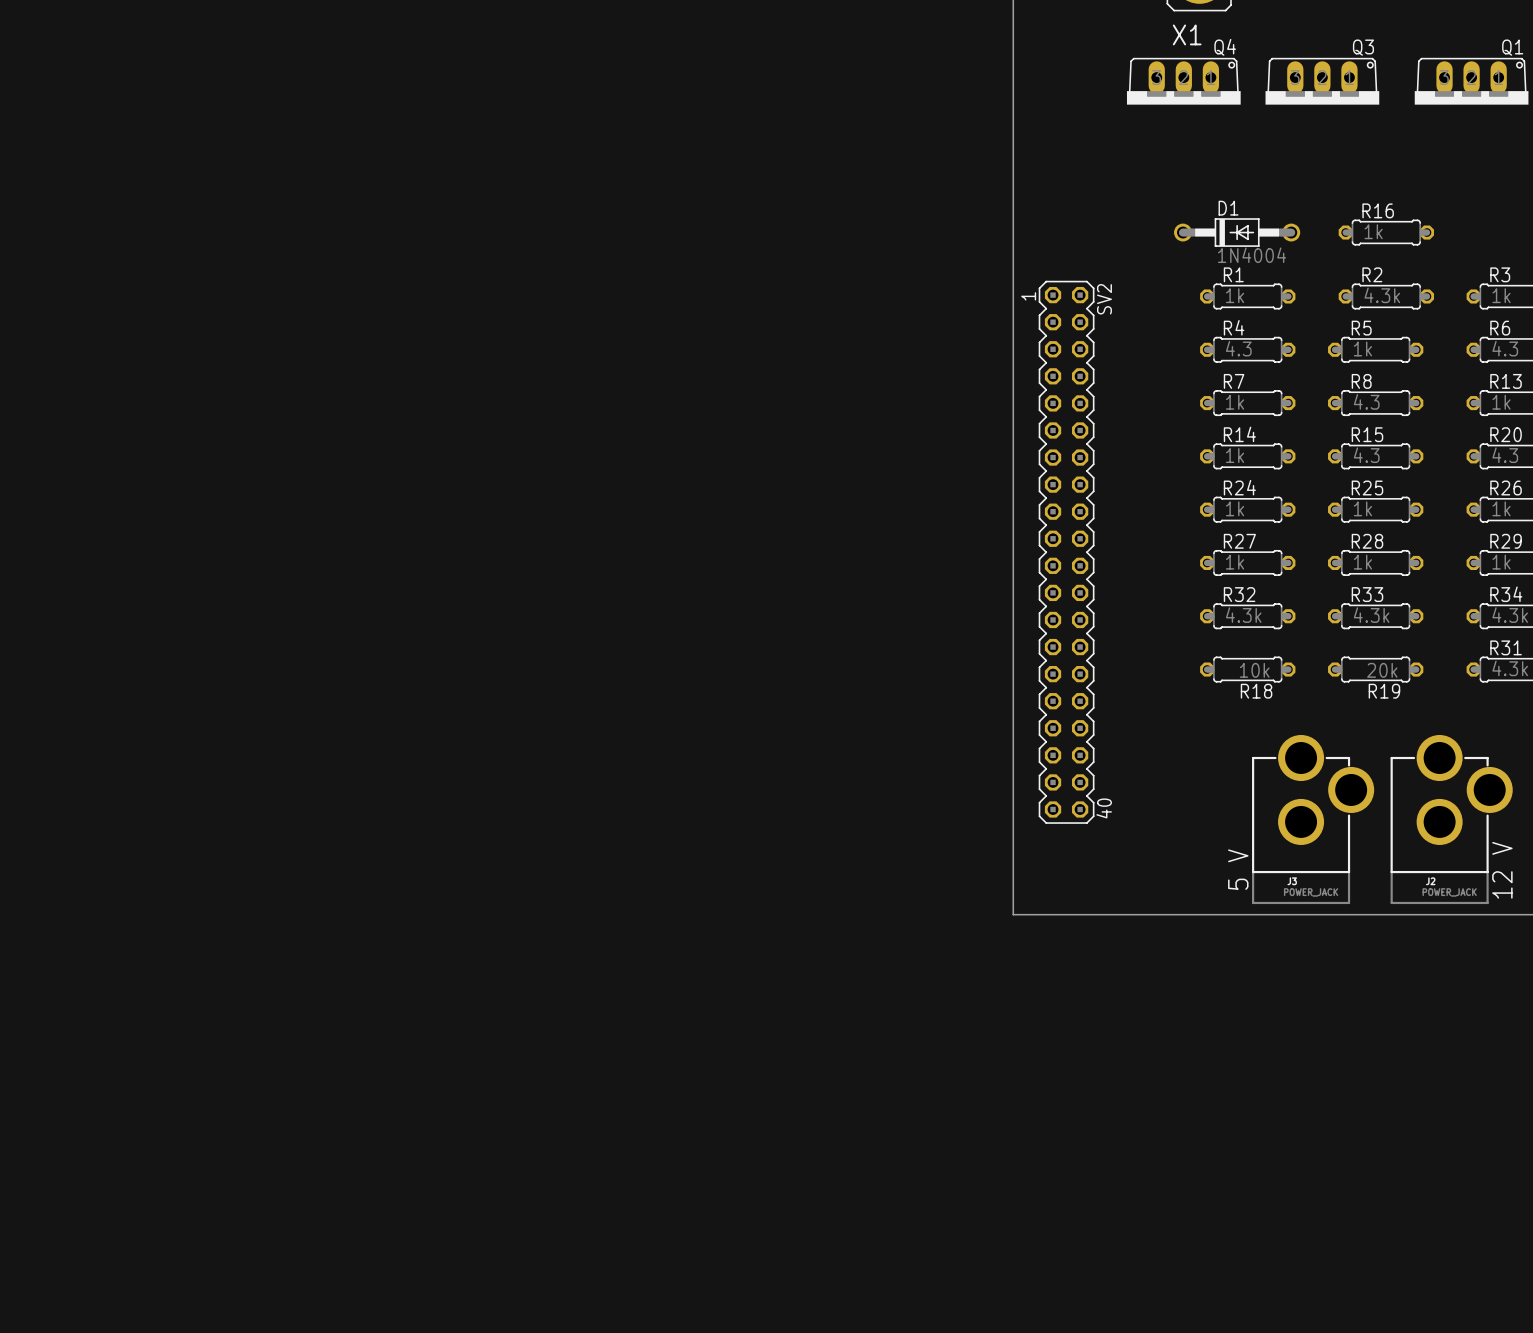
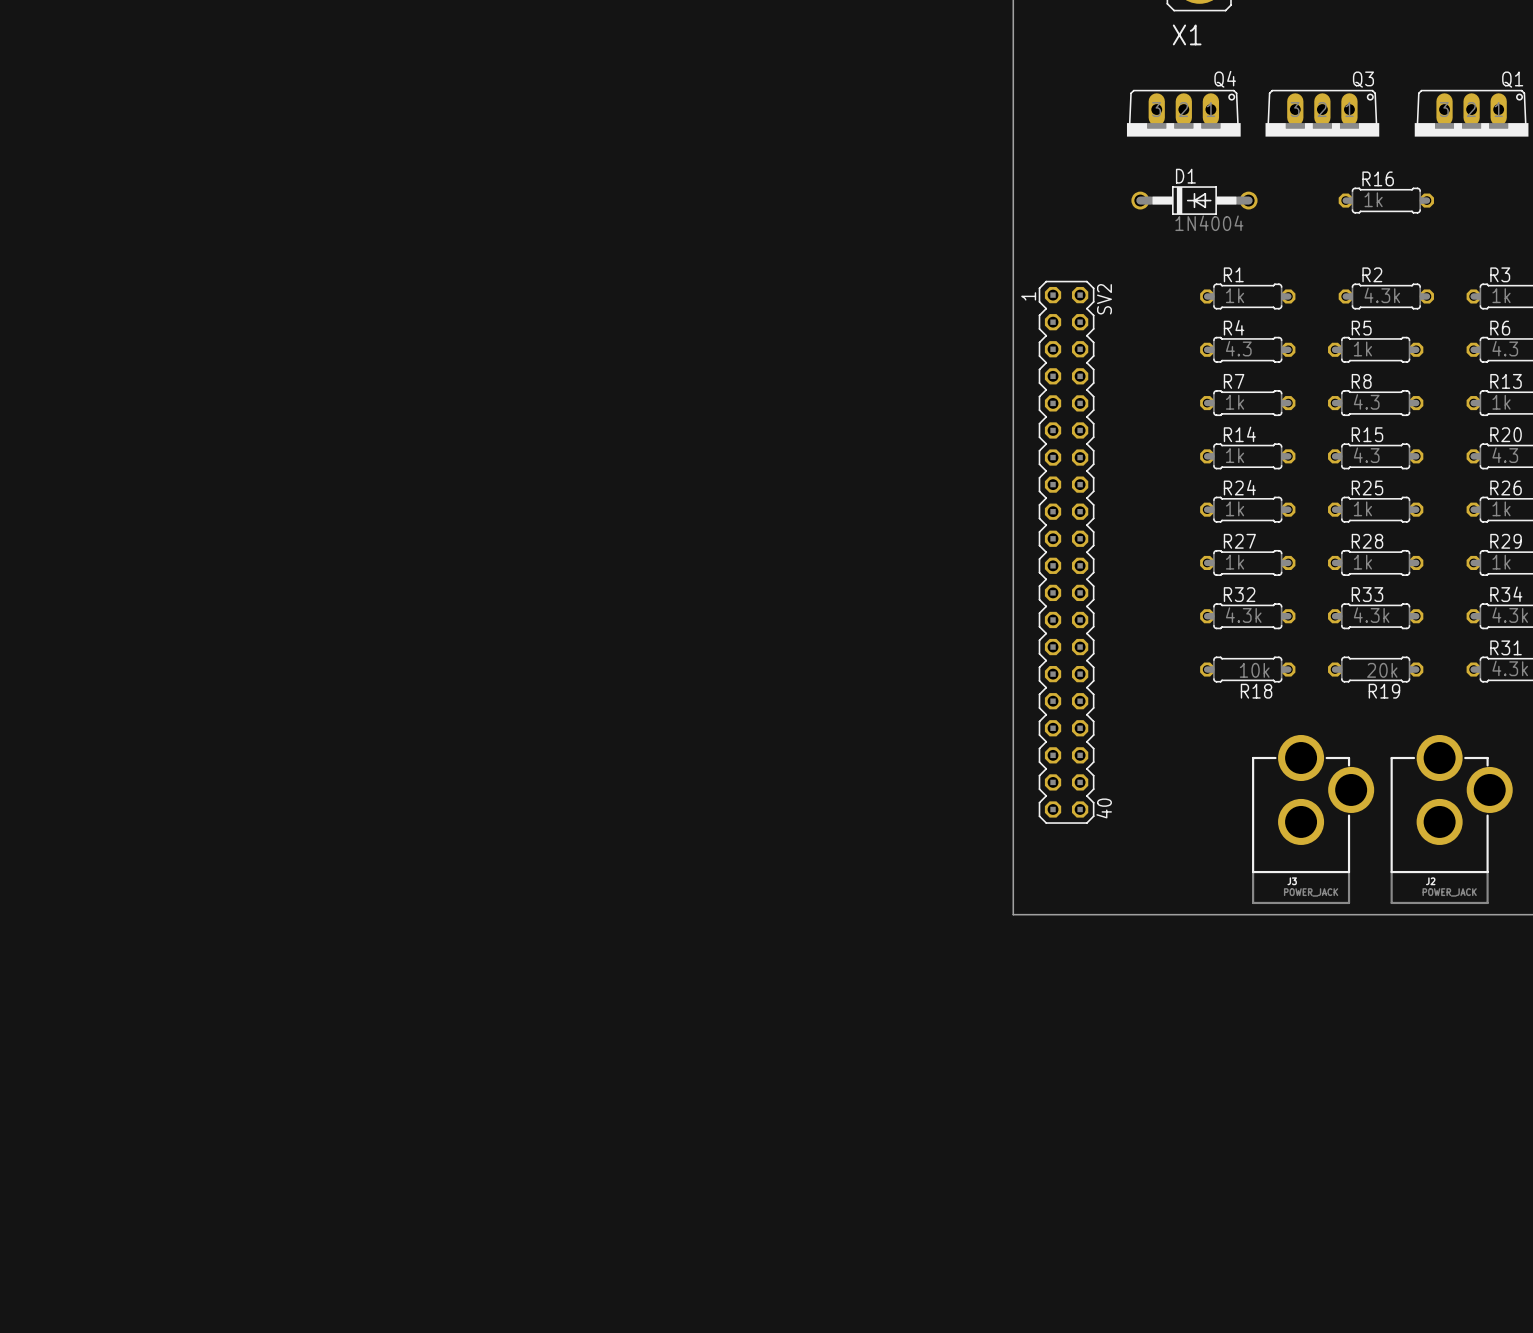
Q4 position: (1183, 81) -> (1183, 113)
Q3 position: (1322, 81) -> (1322, 113)
Q1 position: (1471, 81) -> (1471, 113)
D1 position: (1237, 232) -> (1194, 200)
R16 position: (1386, 232) -> (1386, 200)
text: 5 V (1238, 869) -> none
text: 12 V (1502, 870) -> none

